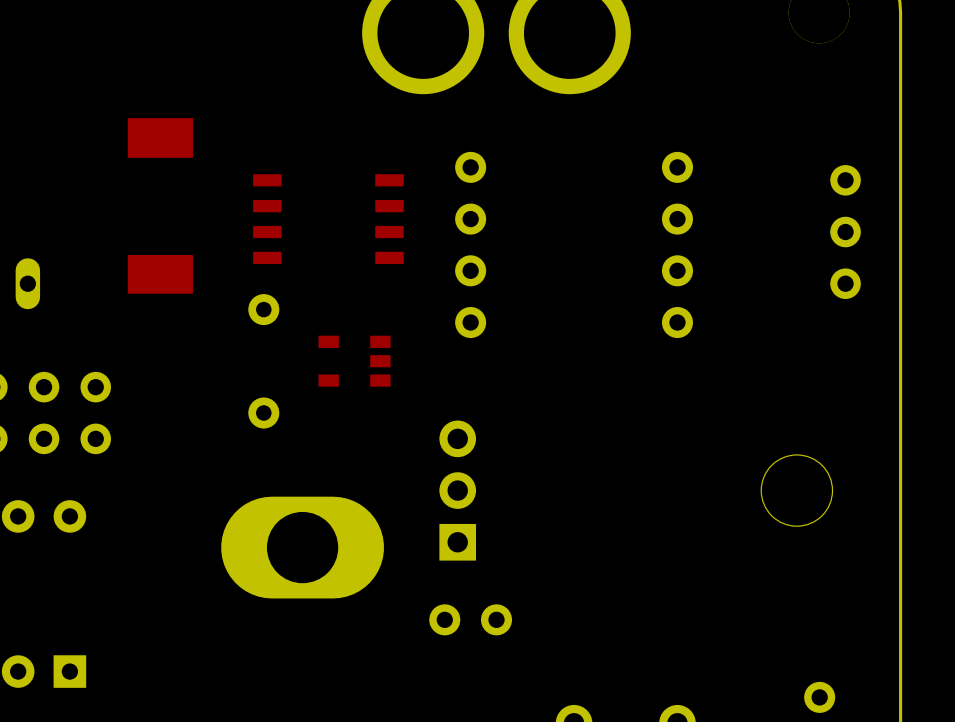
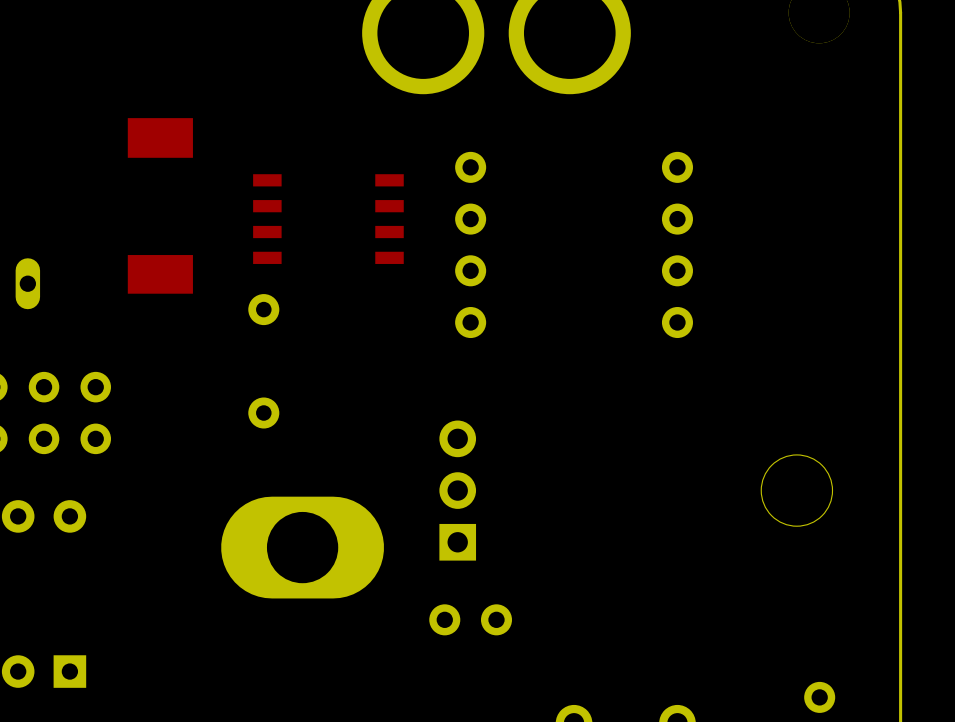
part: (845, 232) -> none
part: (354, 361) -> none

